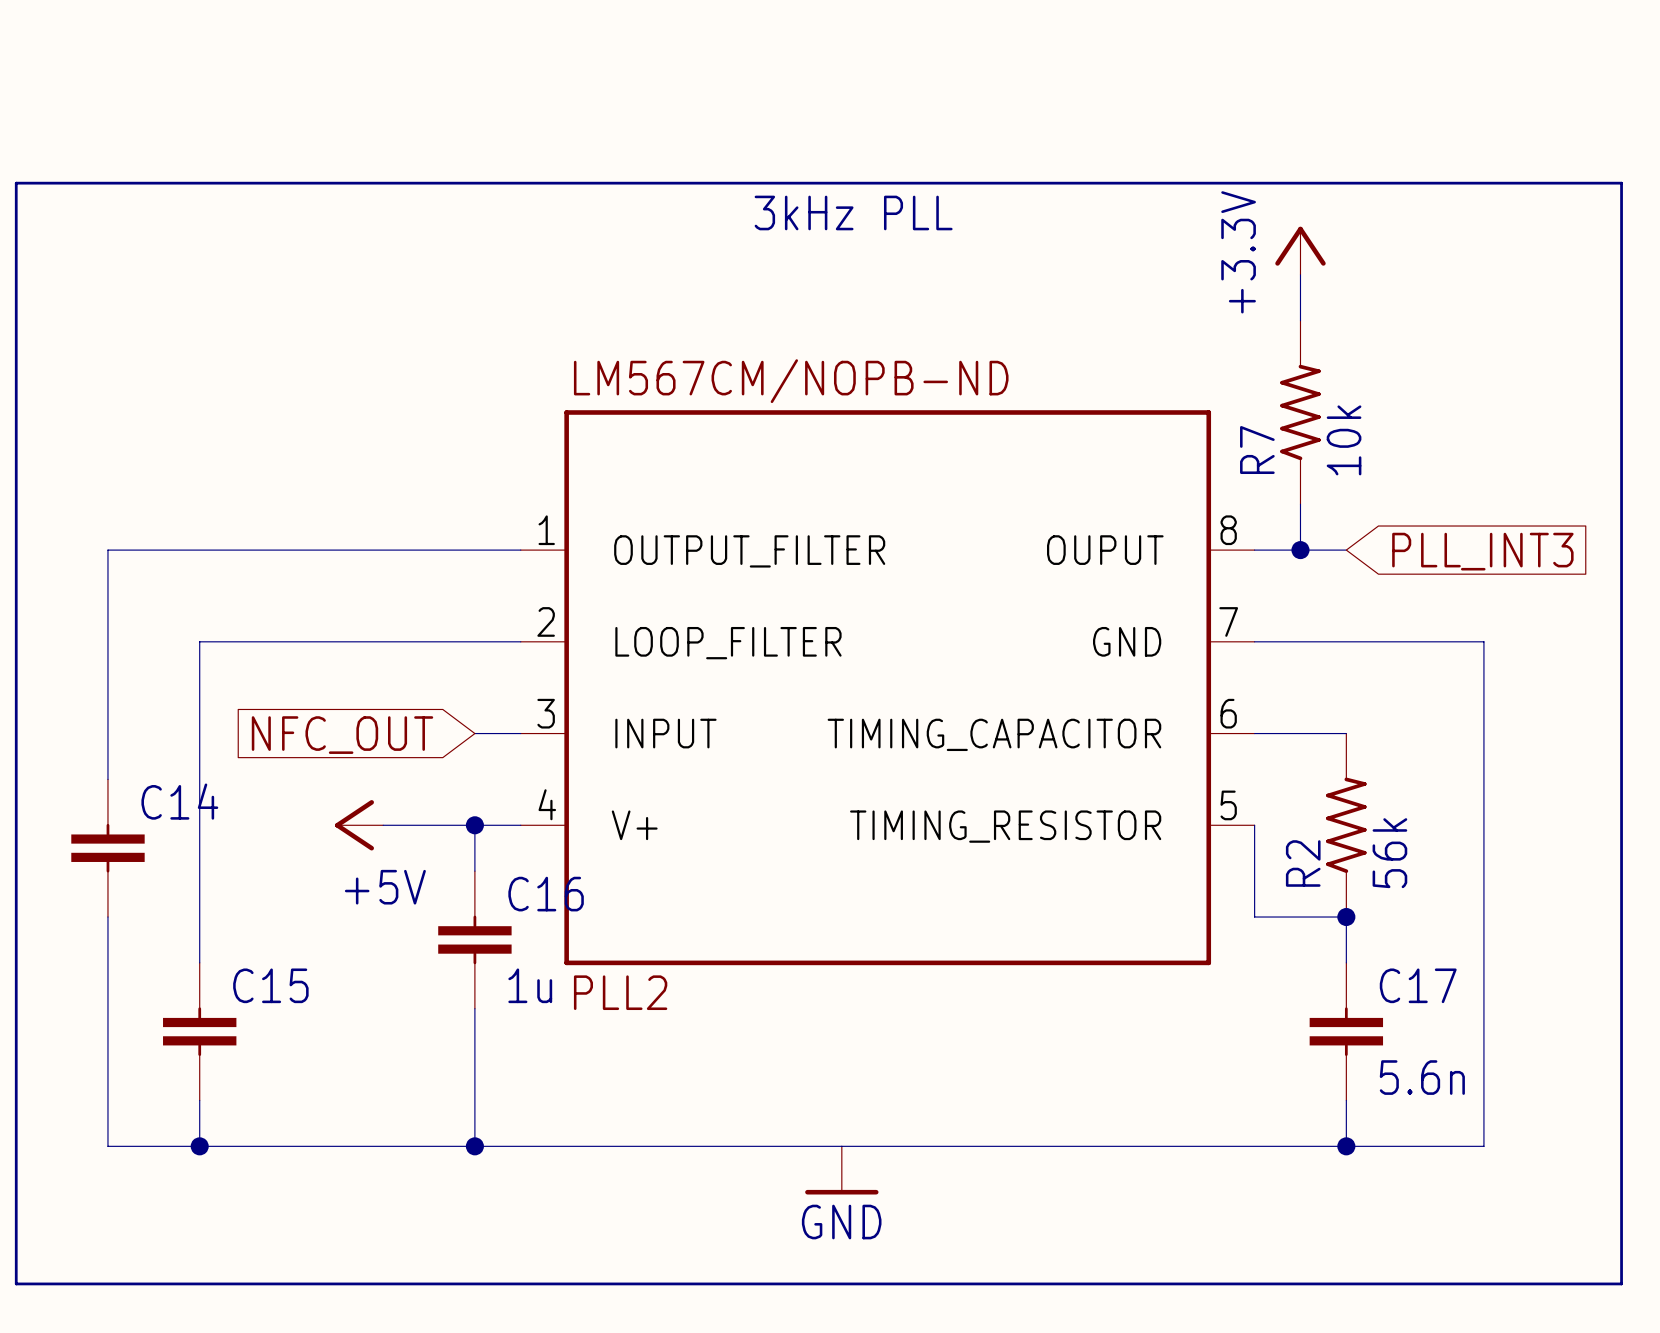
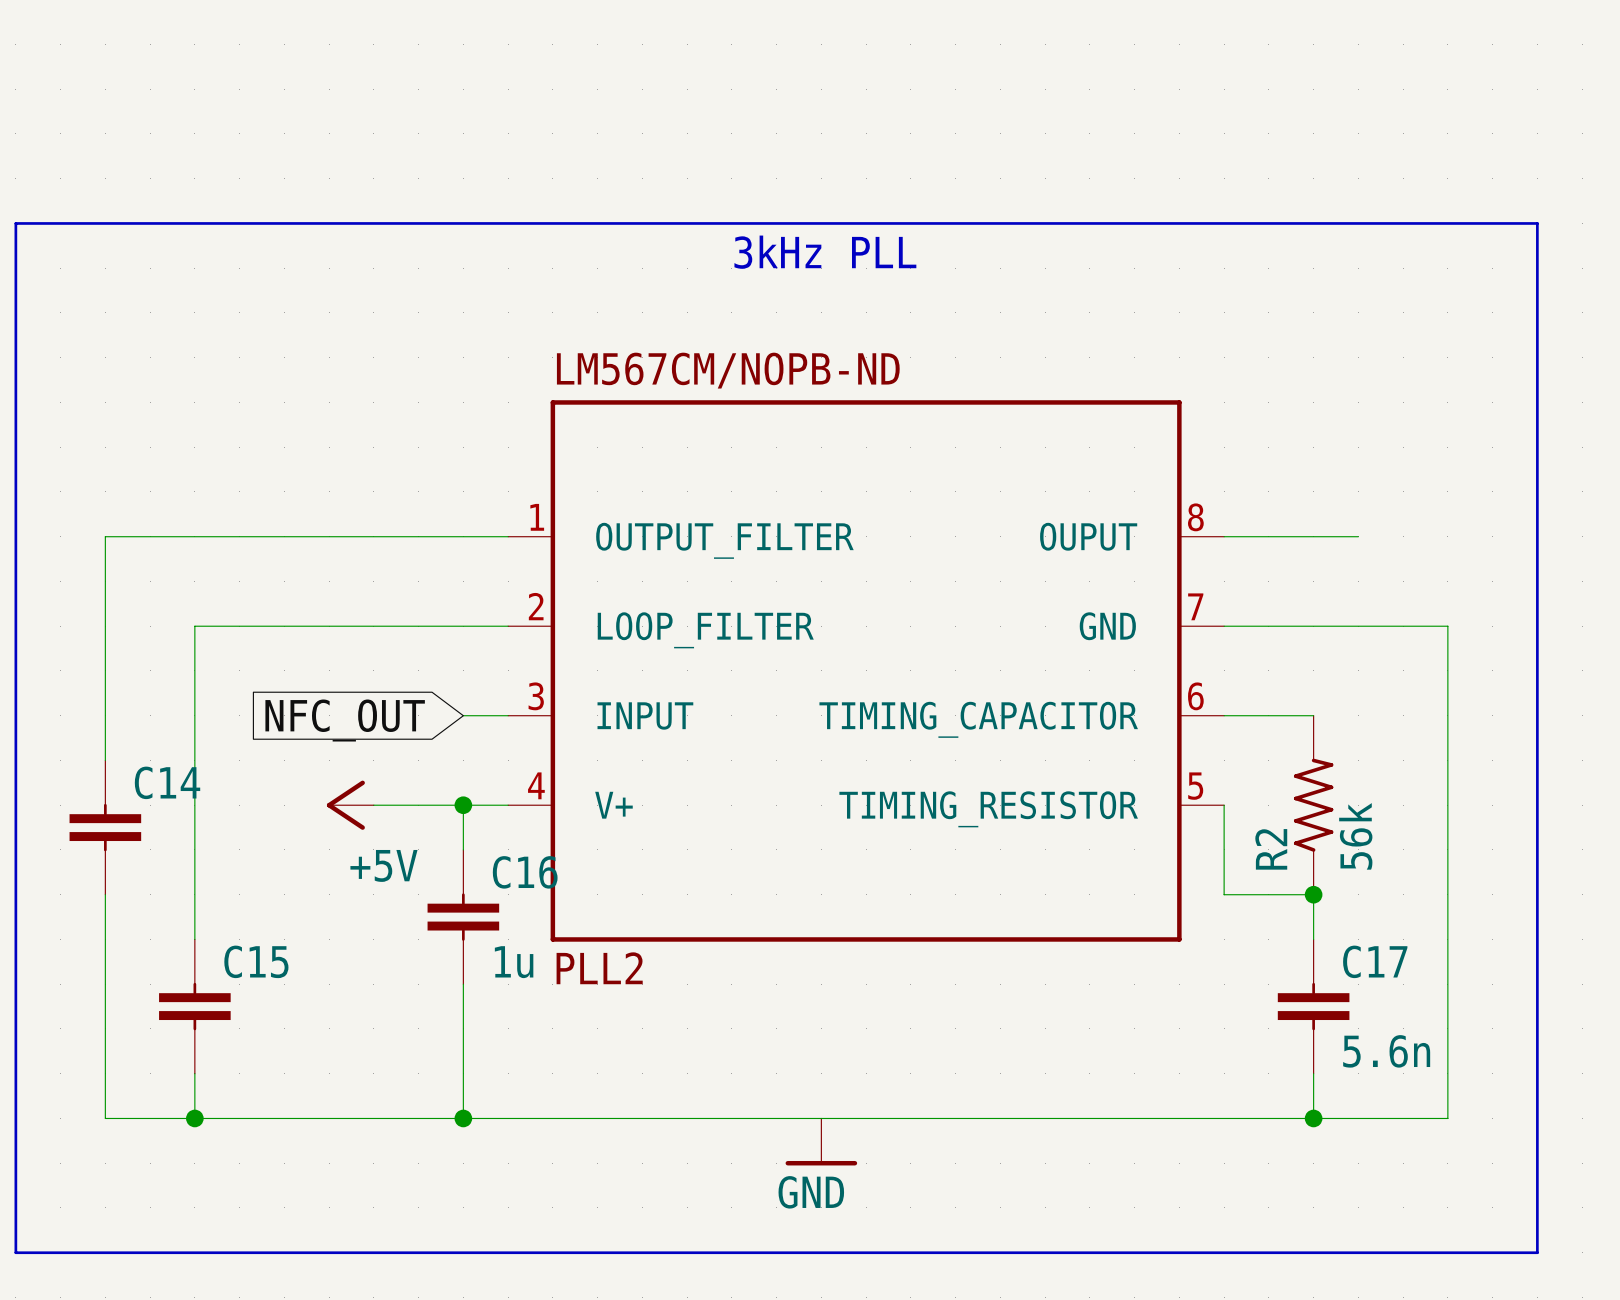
text position: 3kHz PLL (853, 212) -> 3kHz PLL (825, 252)
line: (16, 229) (16, 183) (1621, 183) (1621, 1283) (1575, 1283) -> (15, 223) (1537, 223) (1537, 1252)
power symbol: +3.3V (1300, 250) -> none
wire: (1300, 274) (1300, 320) -> none
R7: 10k (1300, 412) -> none
wire: (1300, 504) (1300, 550) -> none
junction: (1300, 550) -> none
wire: none -> (1313, 536) (1358, 536)
global label: PLL_INT3 (1482, 551) -> none

